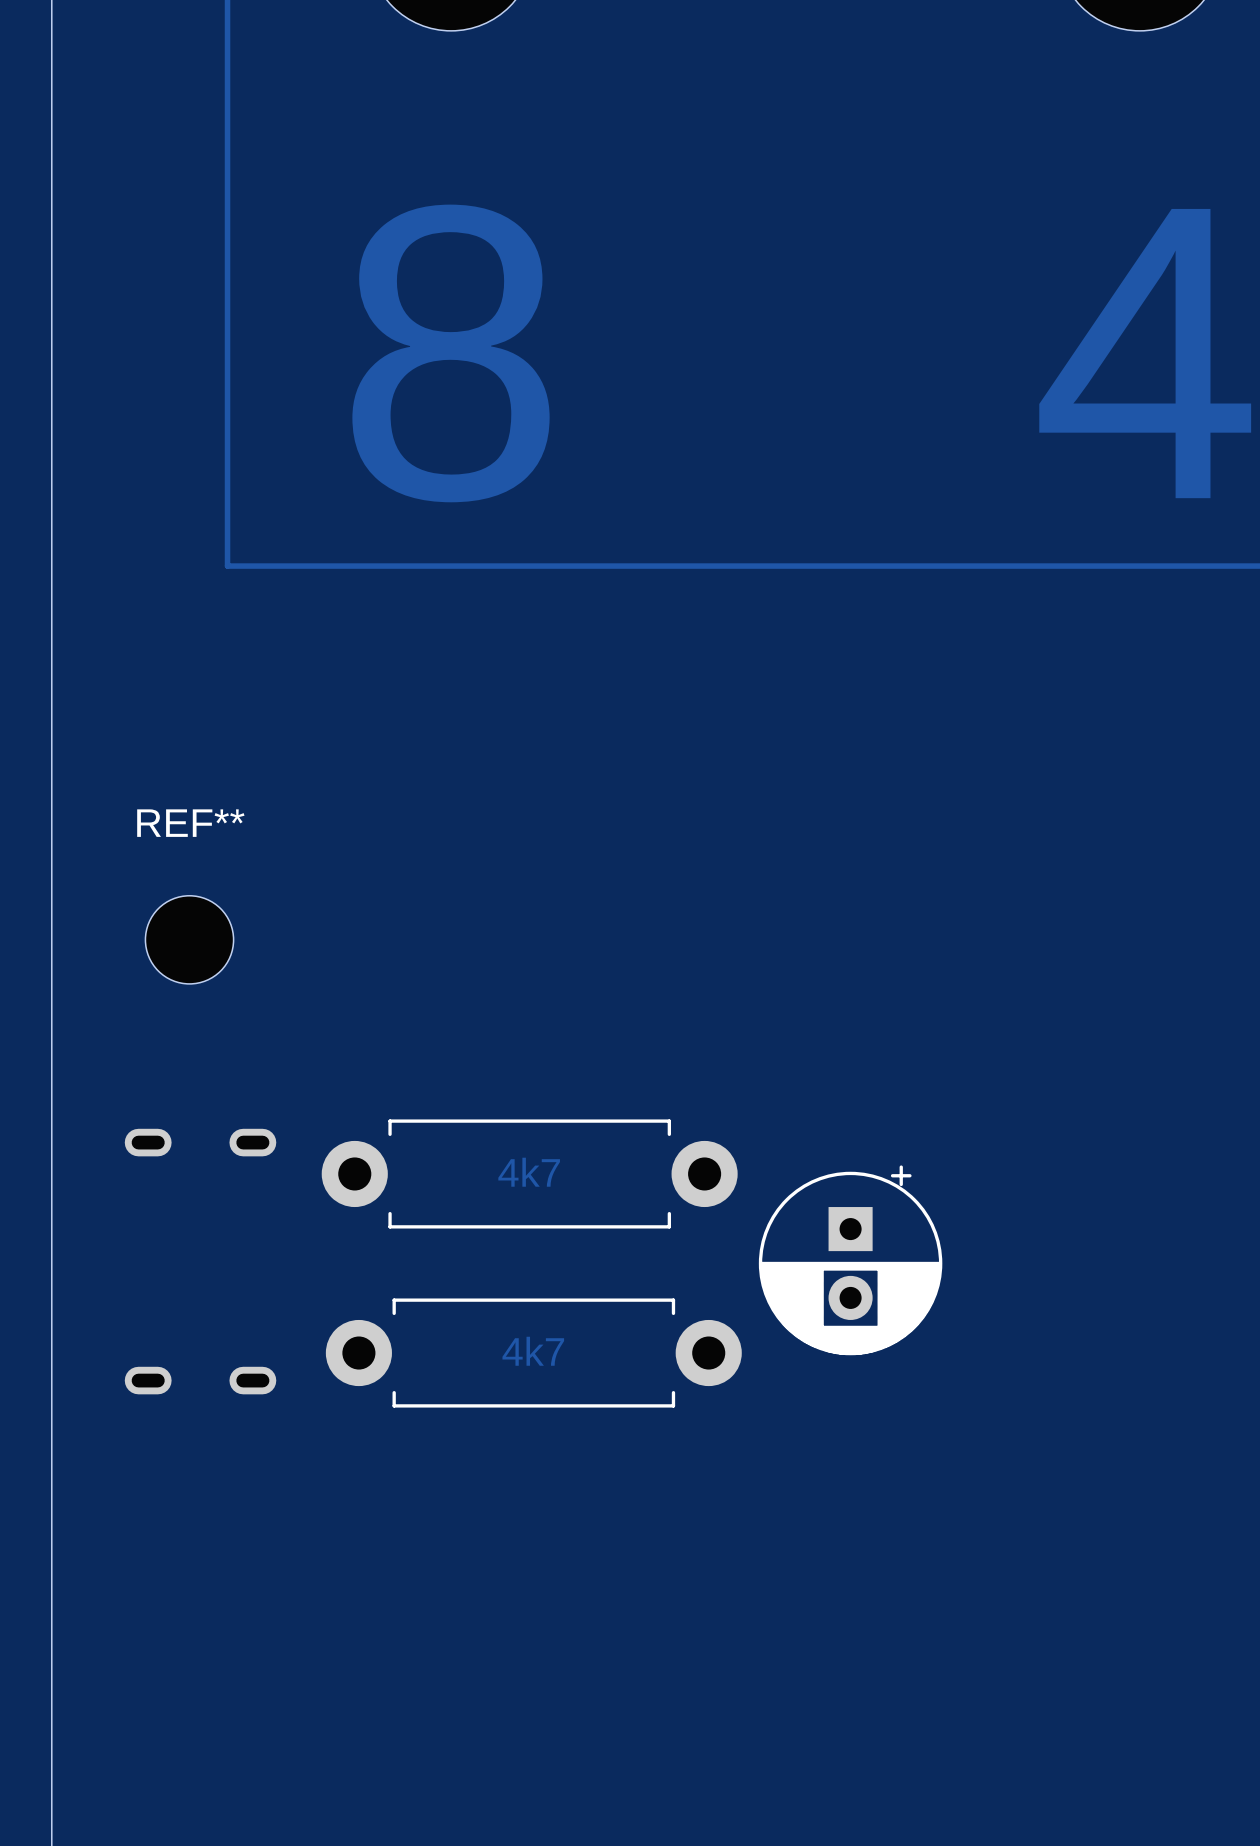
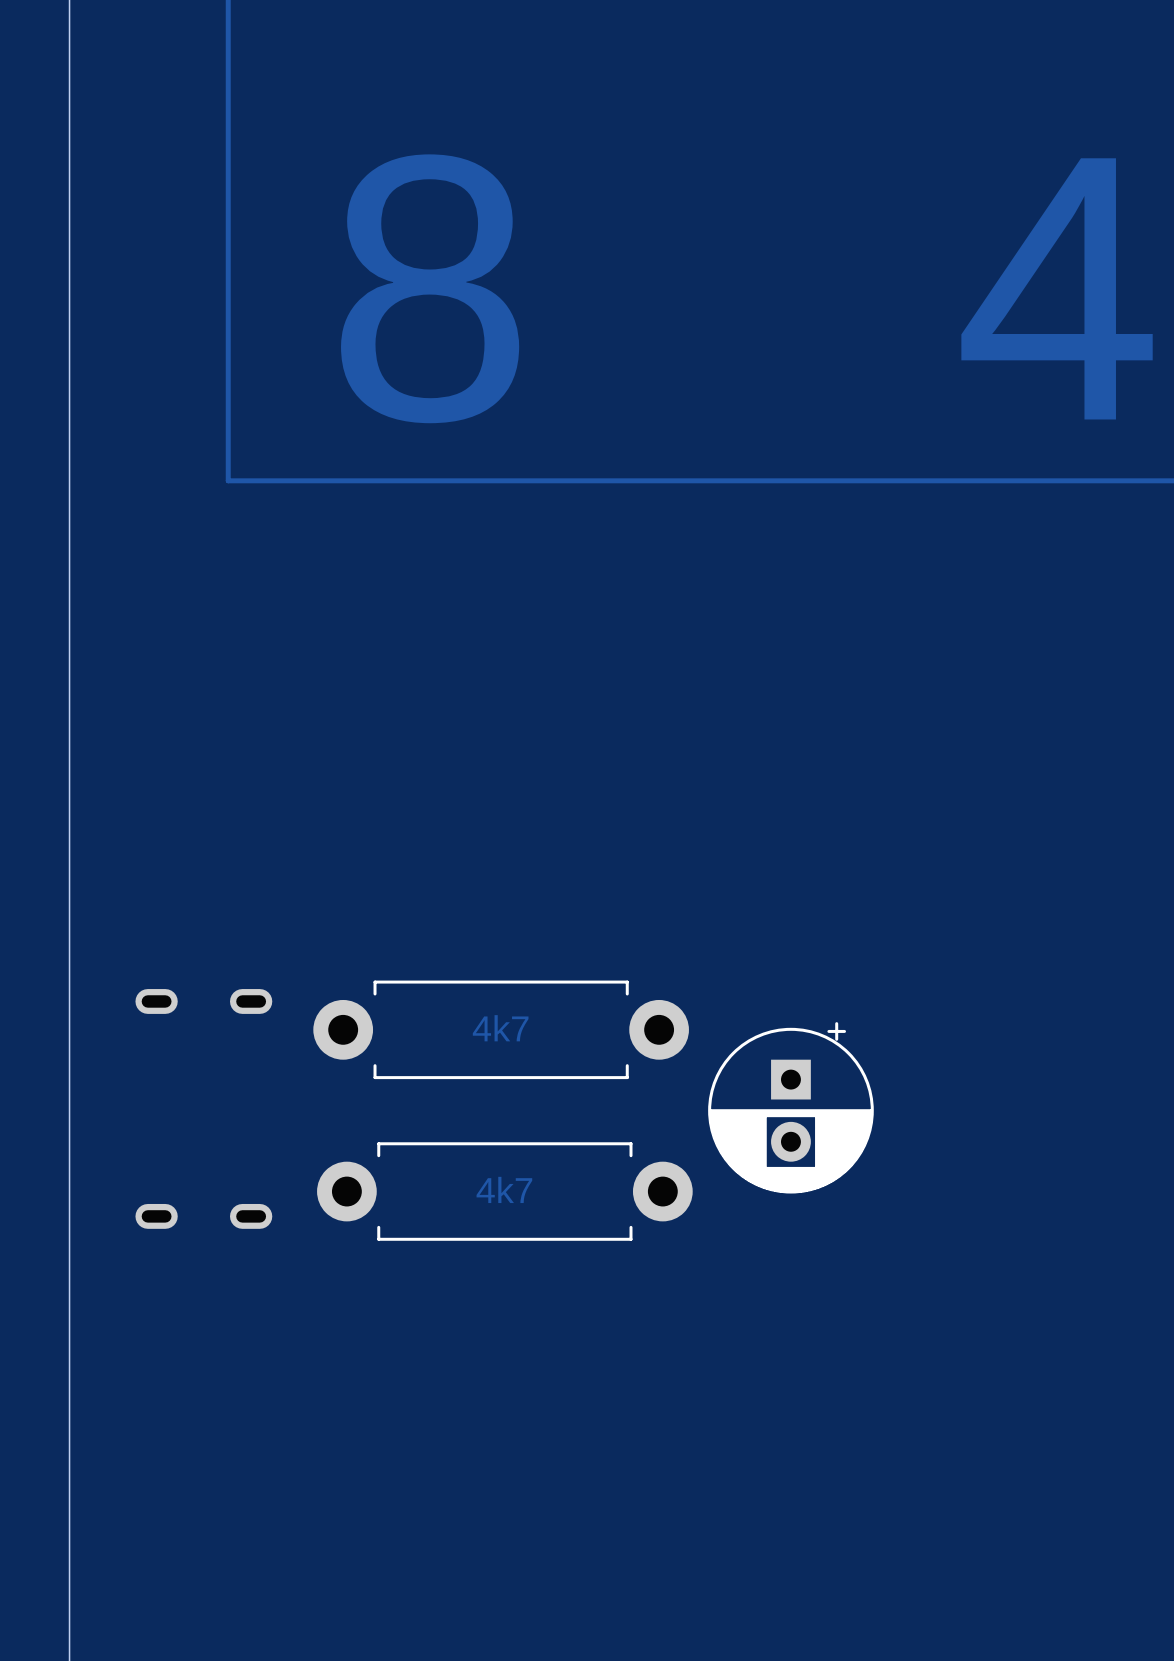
REF**: (189, 939) -> none

